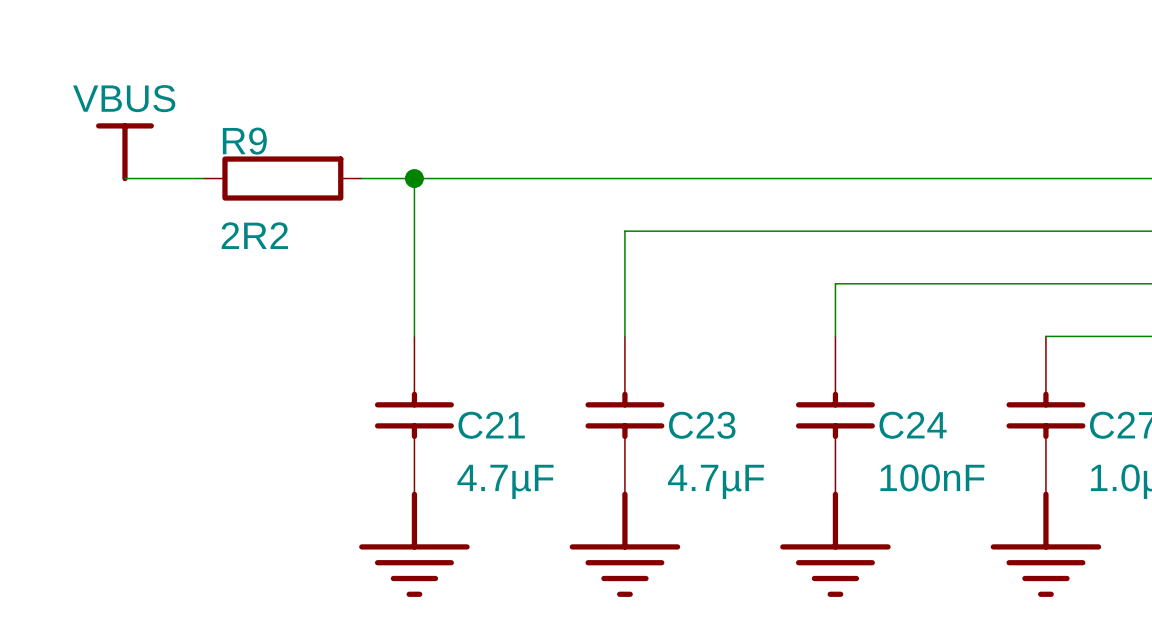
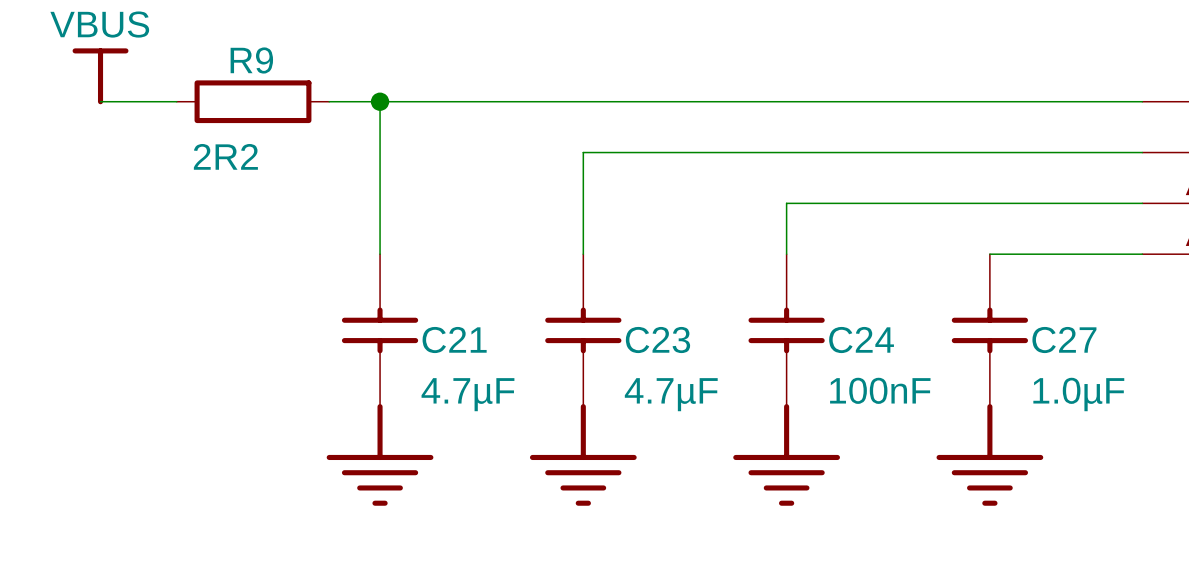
R9 name position: R9 (244, 141) -> R9 (251, 60)

